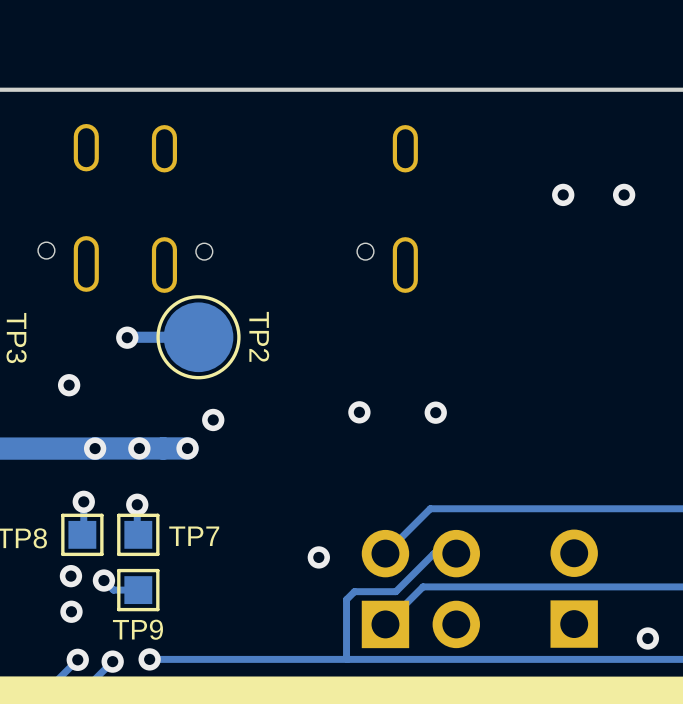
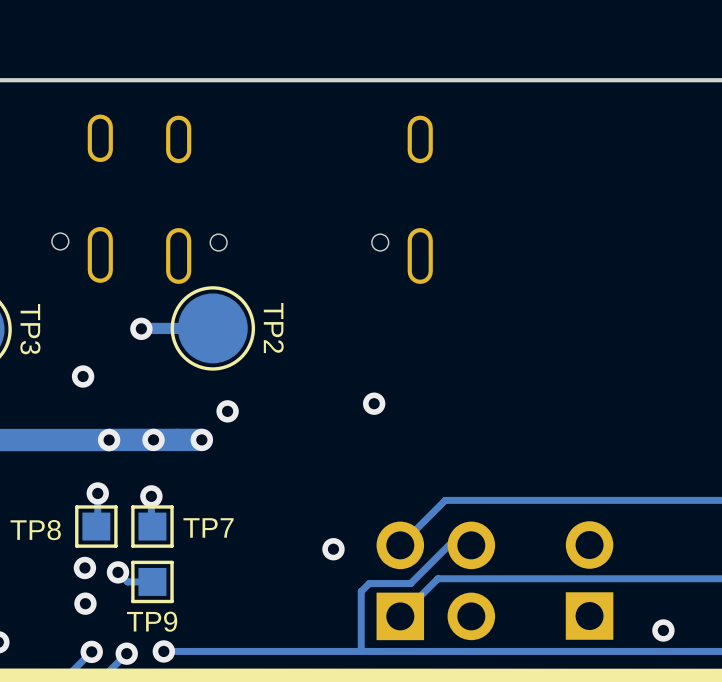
via: (563, 194) -> none
via: (624, 194) -> none
via: (435, 412) -> none

